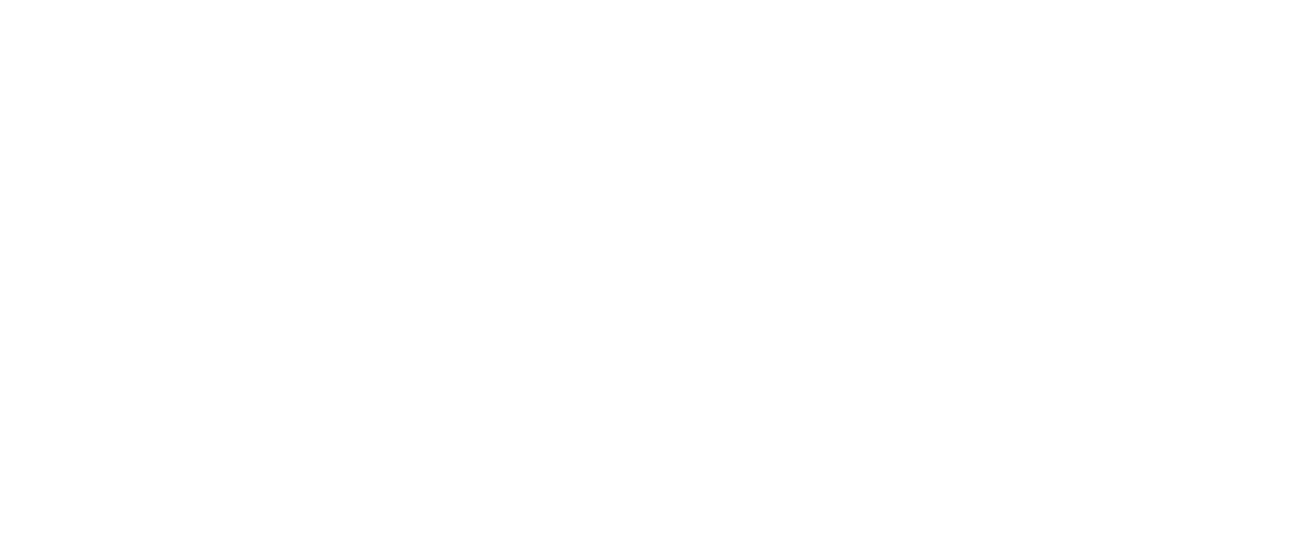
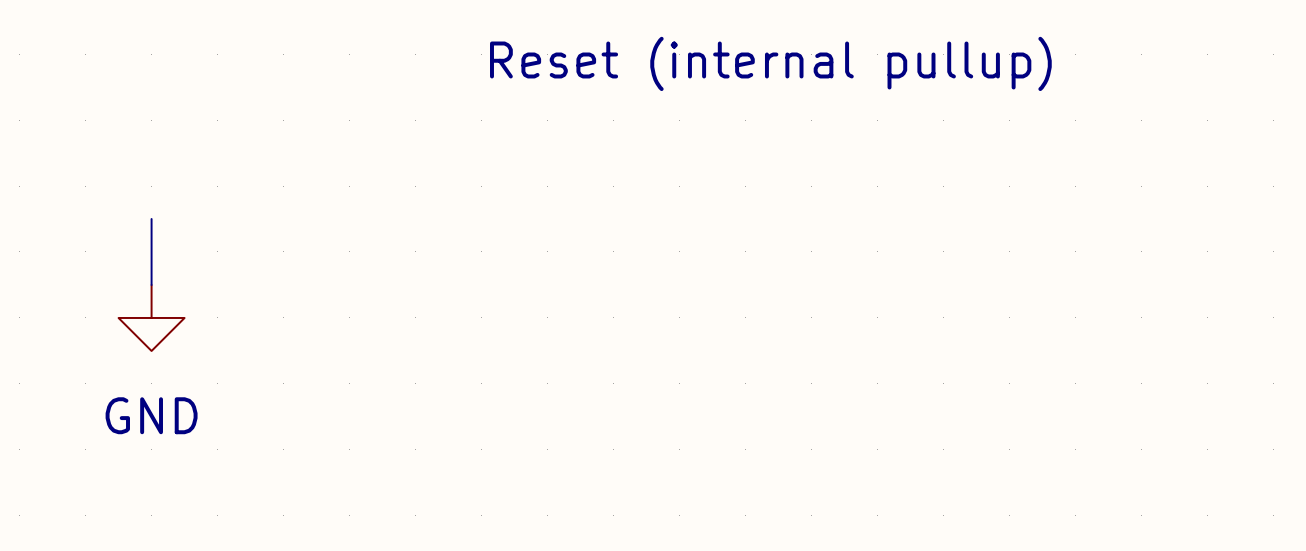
text: none -> Reset (internal pullup) (770, 63)
wire: none -> (151, 219) (151, 284)
power symbol: none -> GND (151, 317)

